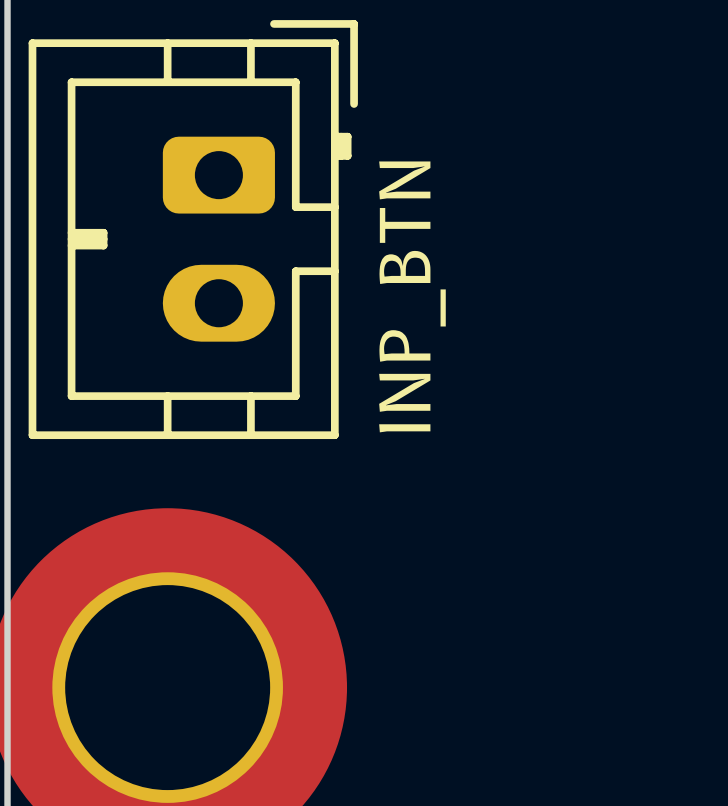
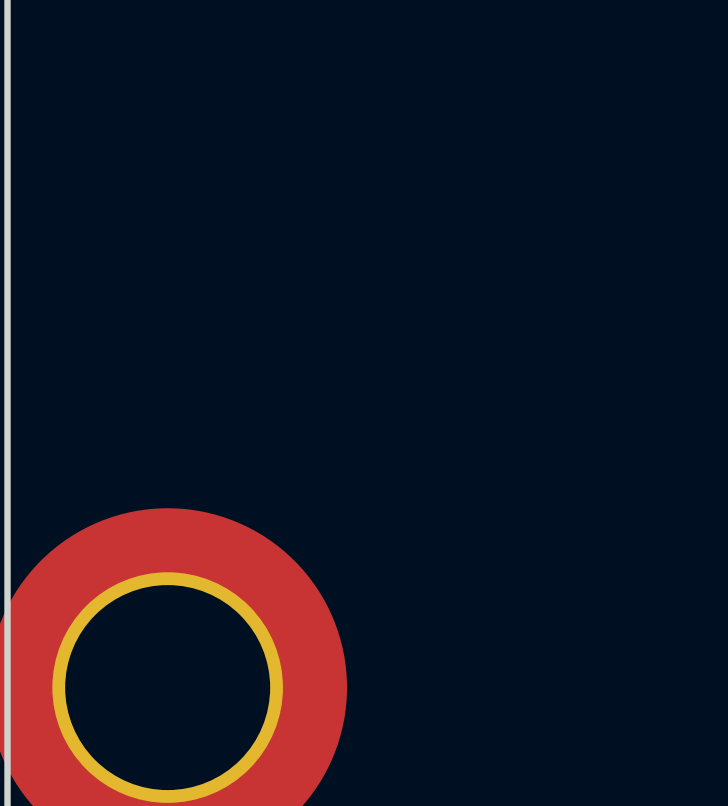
part: (193, 229) -> none
text: INP_BTN (412, 296) -> none

